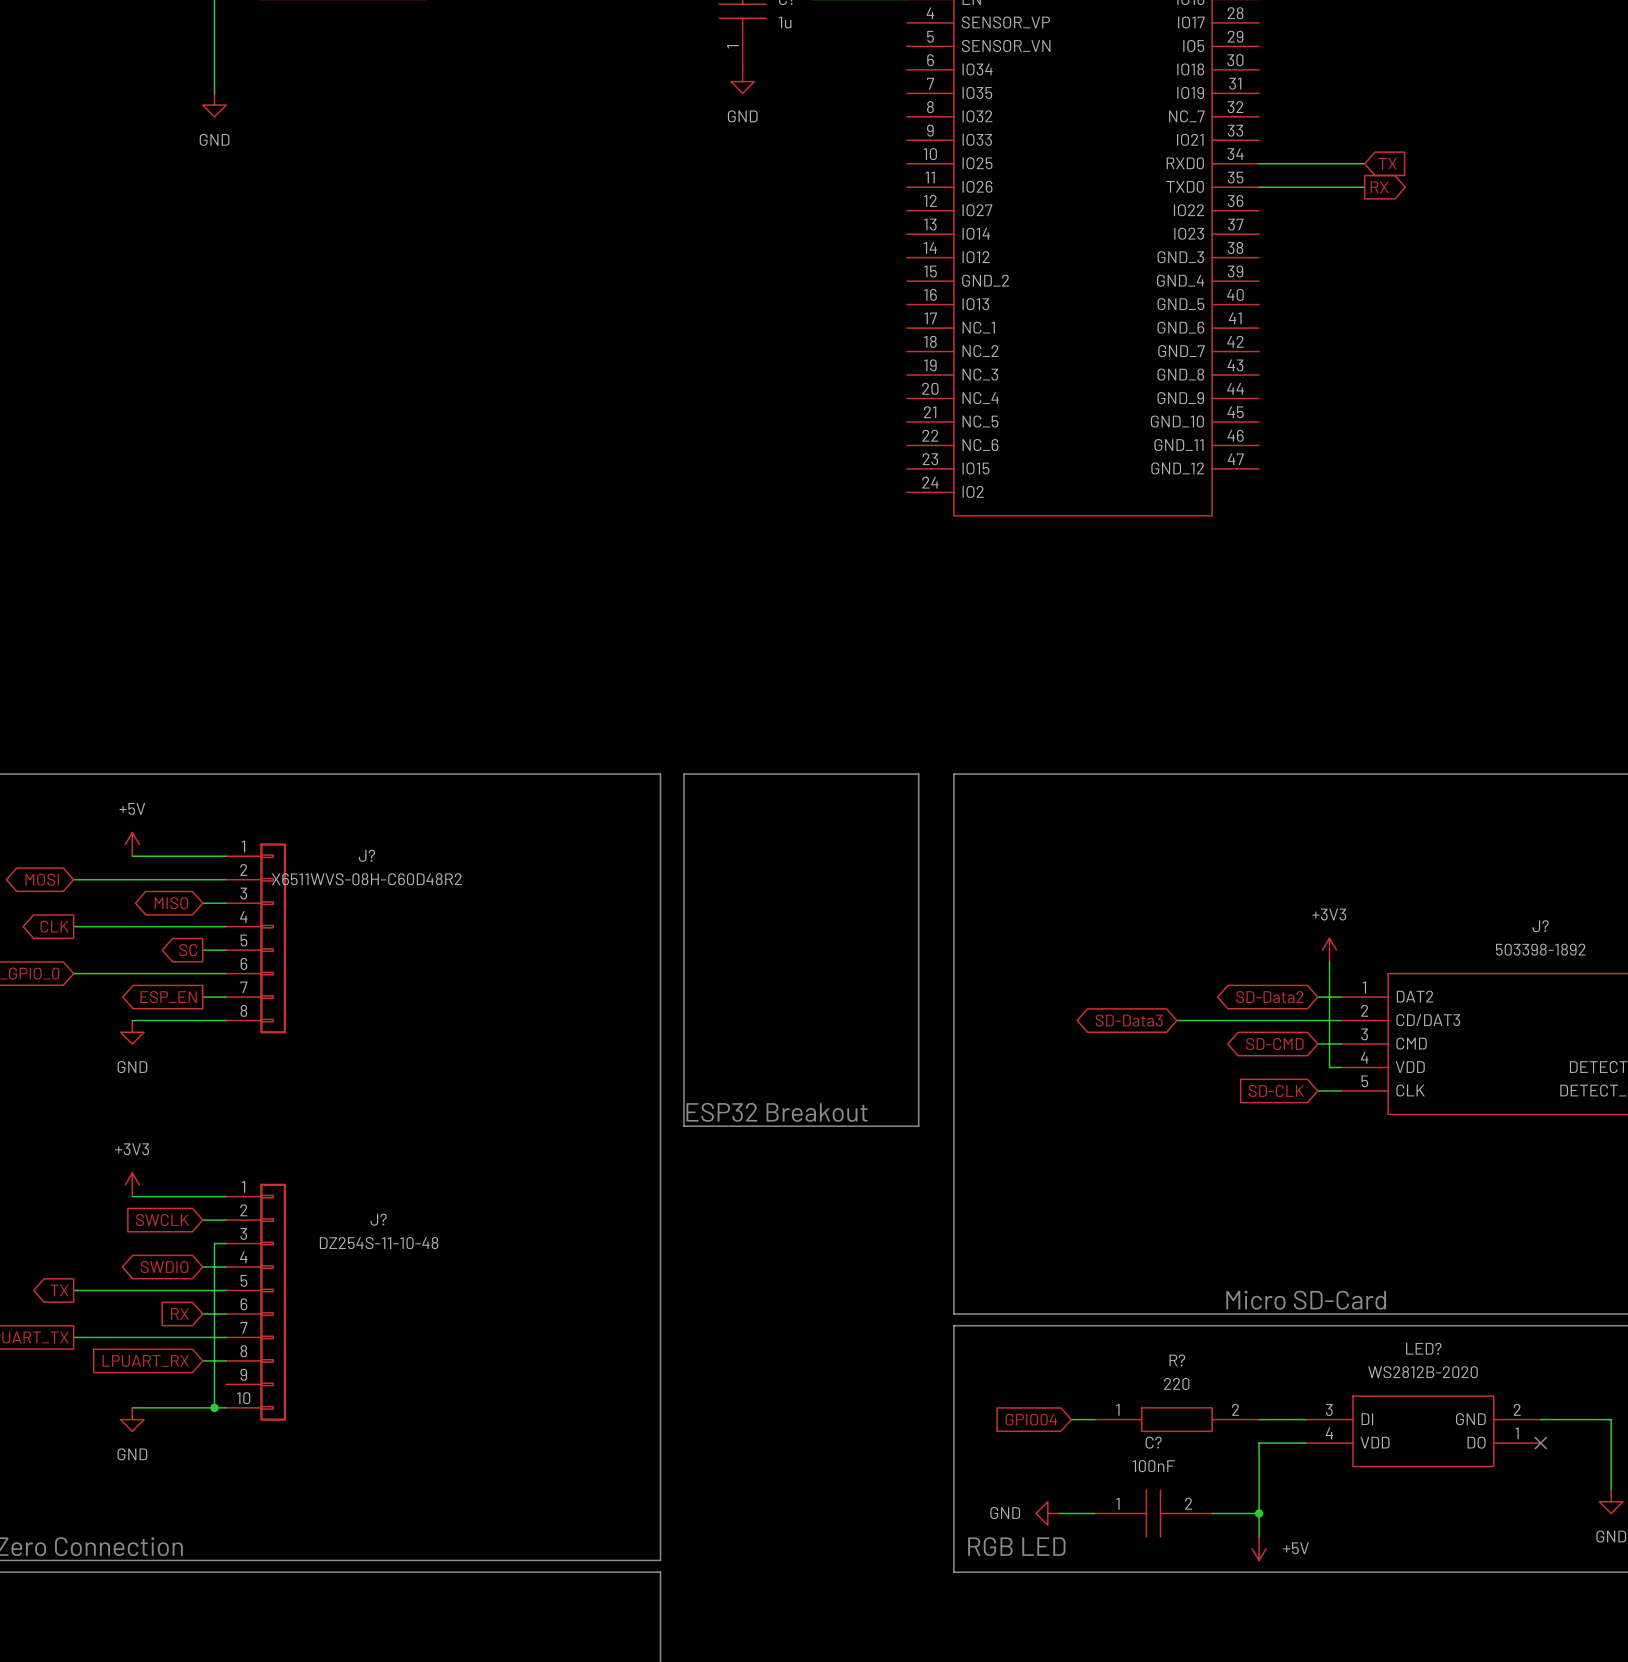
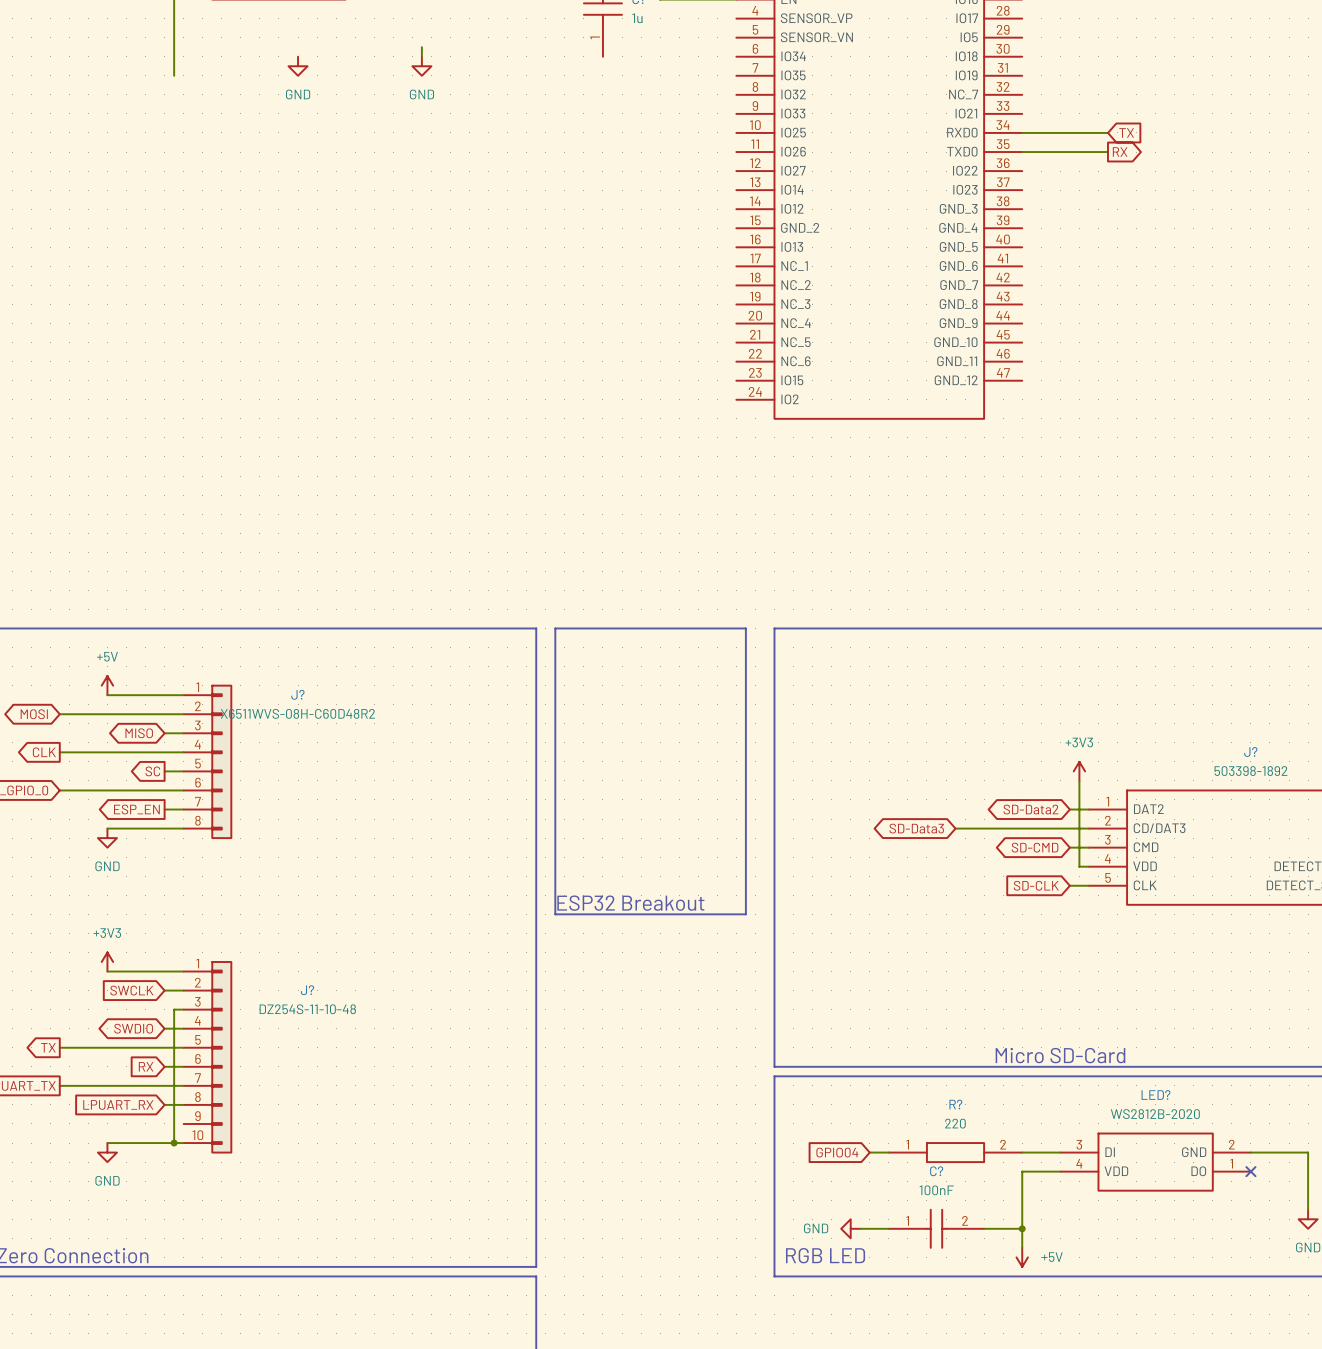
wire: none -> (421, 47) (421, 56)
power symbol: none -> GND (298, 66)
power symbol: none -> GND (421, 66)
power symbol: GND (742, 81) -> none
power symbol: GND (214, 105) -> none

